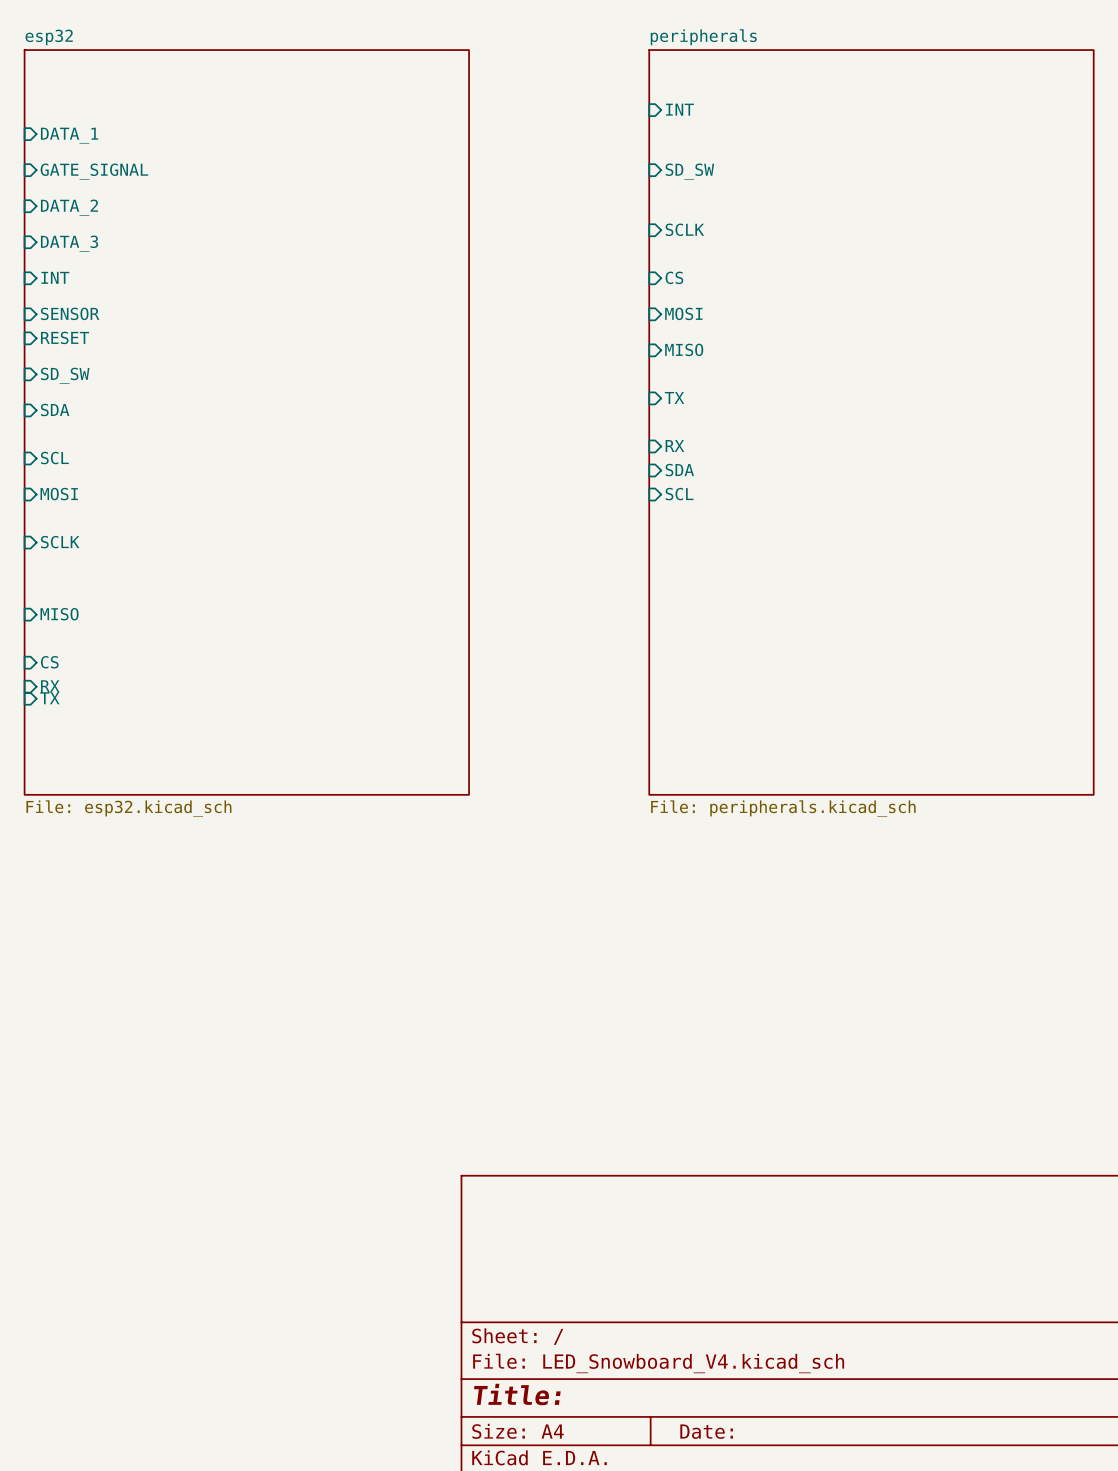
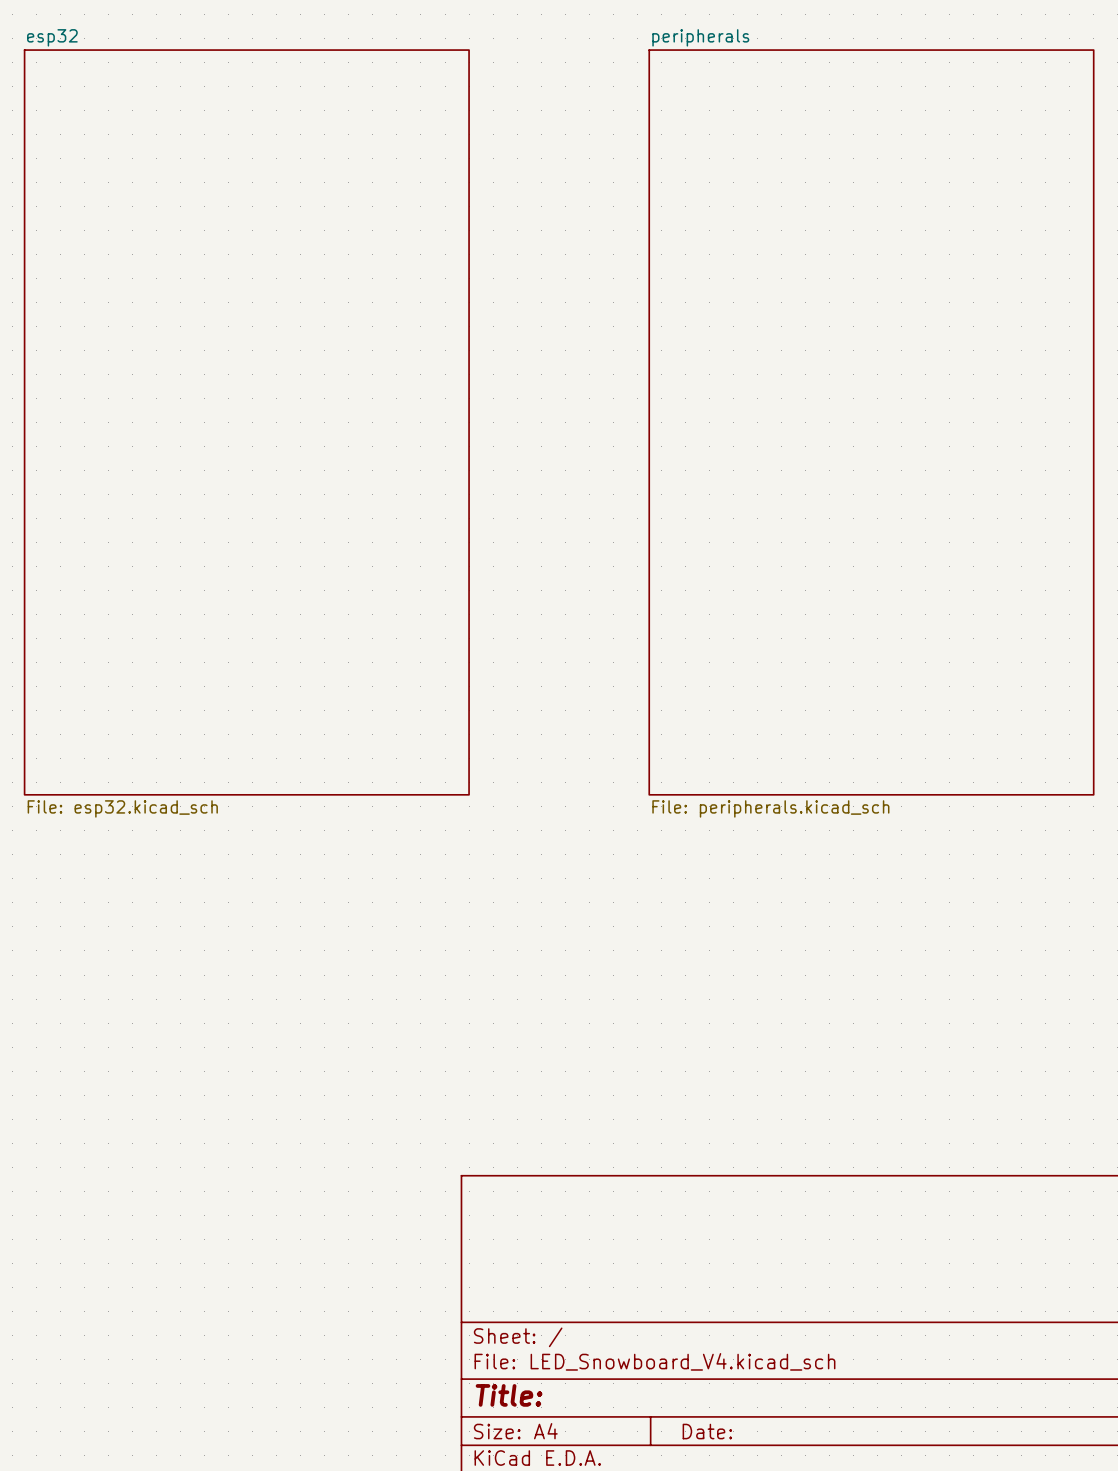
sheet pin: INT (679, 109) -> none
sheet pin: DATA_1 (69, 135) -> none
sheet pin: GATE_SIGNAL (94, 171) -> none
sheet pin: SD_SW (689, 171) -> none
sheet pin: DATA_2 (69, 207) -> none
sheet pin: SCLK (684, 229) -> none
sheet pin: DATA_3 (69, 243) -> none
sheet pin: INT (55, 277) -> none
sheet pin: CS (674, 277) -> none
sheet pin: SENSOR (70, 313) -> none
sheet pin: MOSI (683, 313) -> none
sheet pin: RESET (65, 337) -> none
sheet pin: MISO (684, 349) -> none
sheet pin: SD_SW (65, 375) -> none
sheet pin: TX (674, 397) -> none
sheet pin: SDA (55, 409) -> none
sheet pin: RX (674, 446) -> none
sheet pin: SCL (54, 458) -> none
sheet pin: SDA (679, 470) -> none
sheet pin: MOSI (59, 494) -> none
sheet pin: SCL (679, 494) -> none
sheet pin: SCLK (60, 542) -> none
sheet pin: MISO (59, 614) -> none
sheet pin: CS (49, 662) -> none
sheet pin: RX (50, 686) -> none
sheet pin: TX (49, 698) -> none

